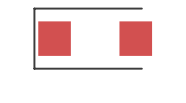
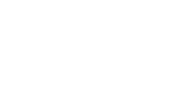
part: (92, 38) -> none

